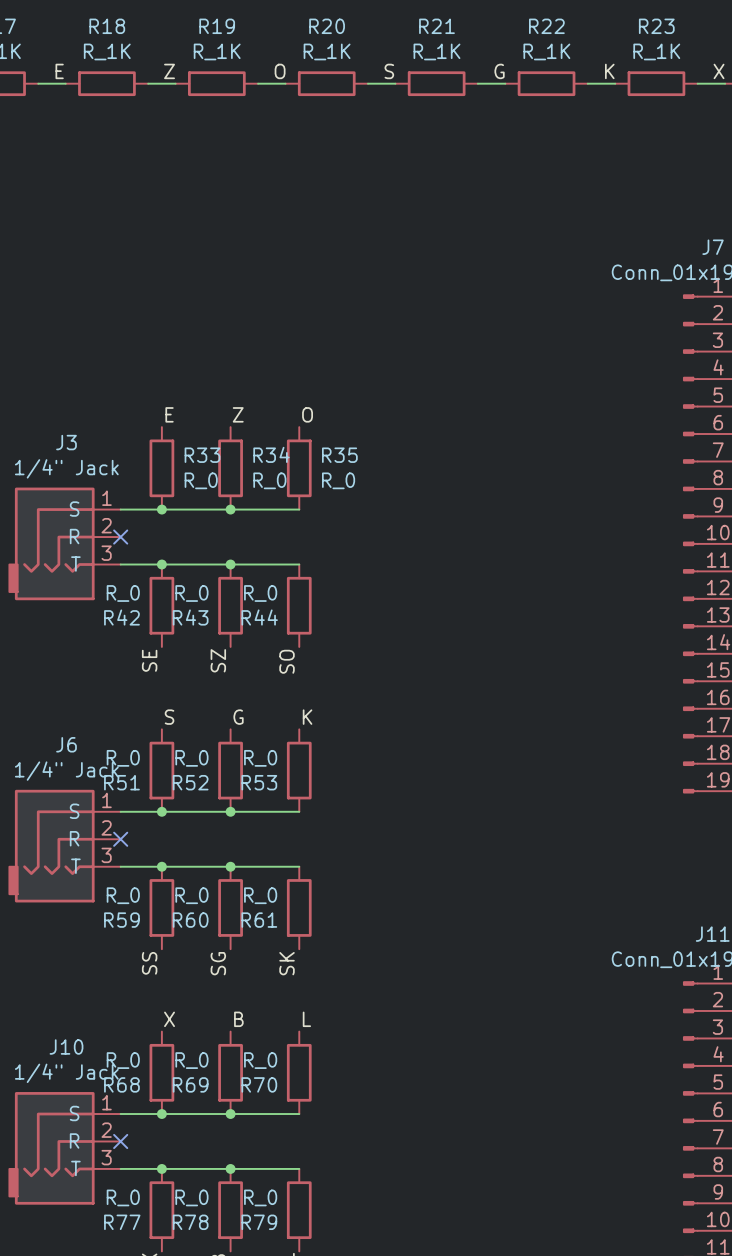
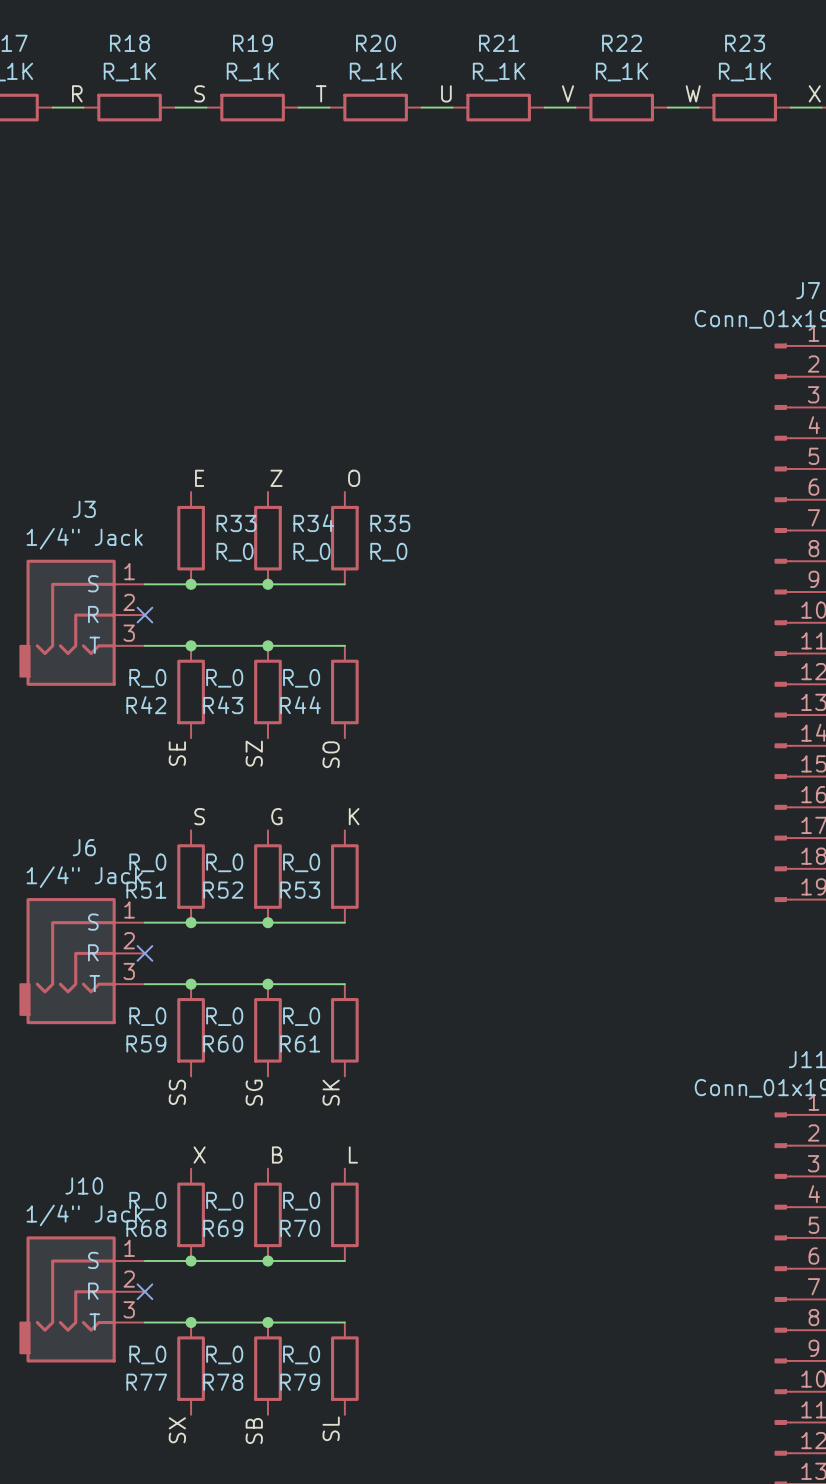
label: E (59, 71) -> R (77, 93)
label: Z (169, 71) -> S (199, 93)
label: O (280, 71) -> T (321, 93)
label: S (389, 71) -> U (446, 93)
label: G (499, 71) -> V (567, 93)
label: K (609, 71) -> W (693, 93)

